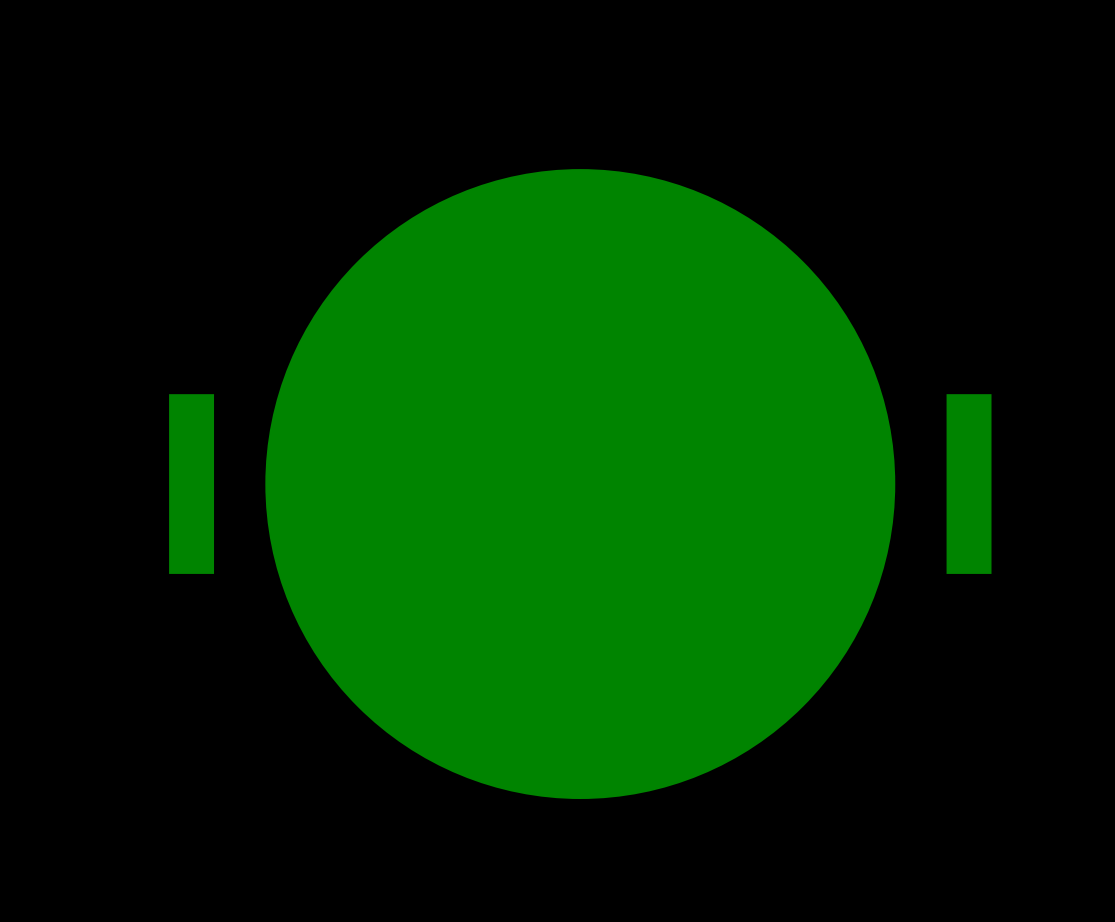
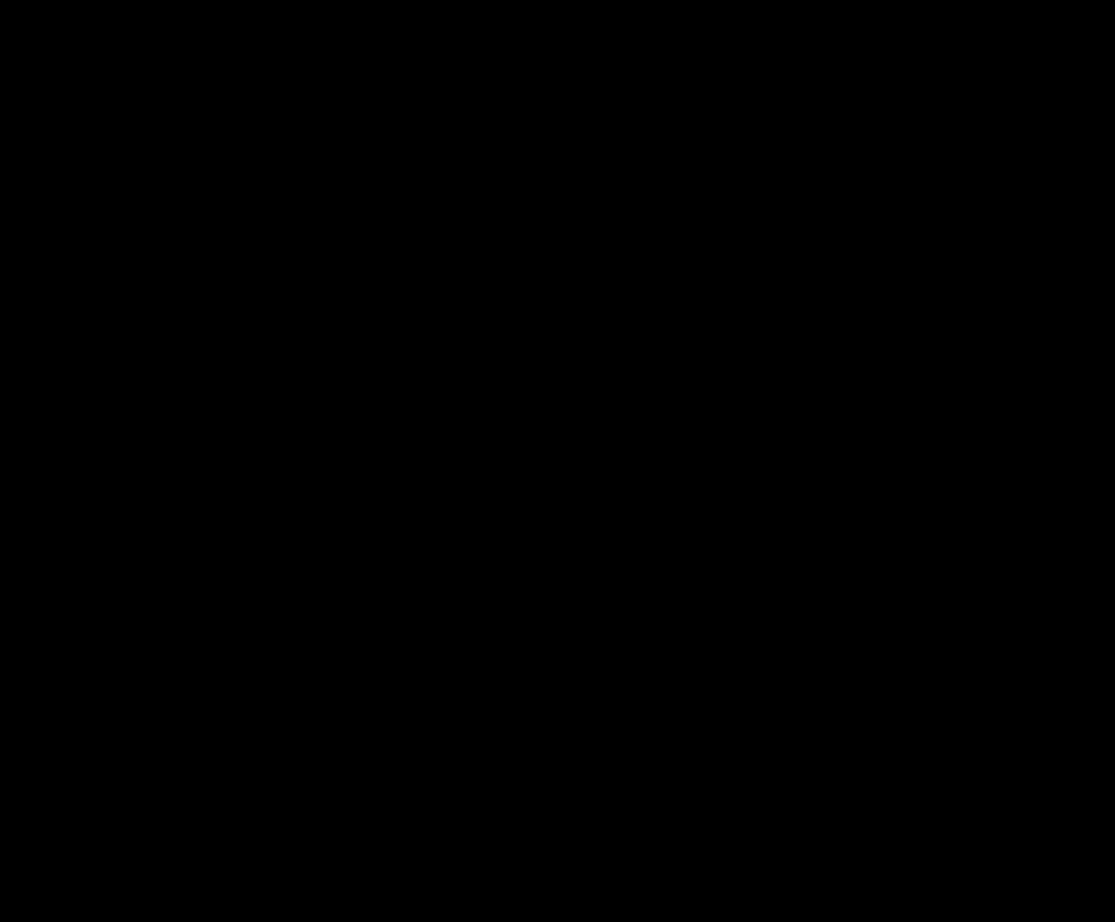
part: (580, 484) -> none

